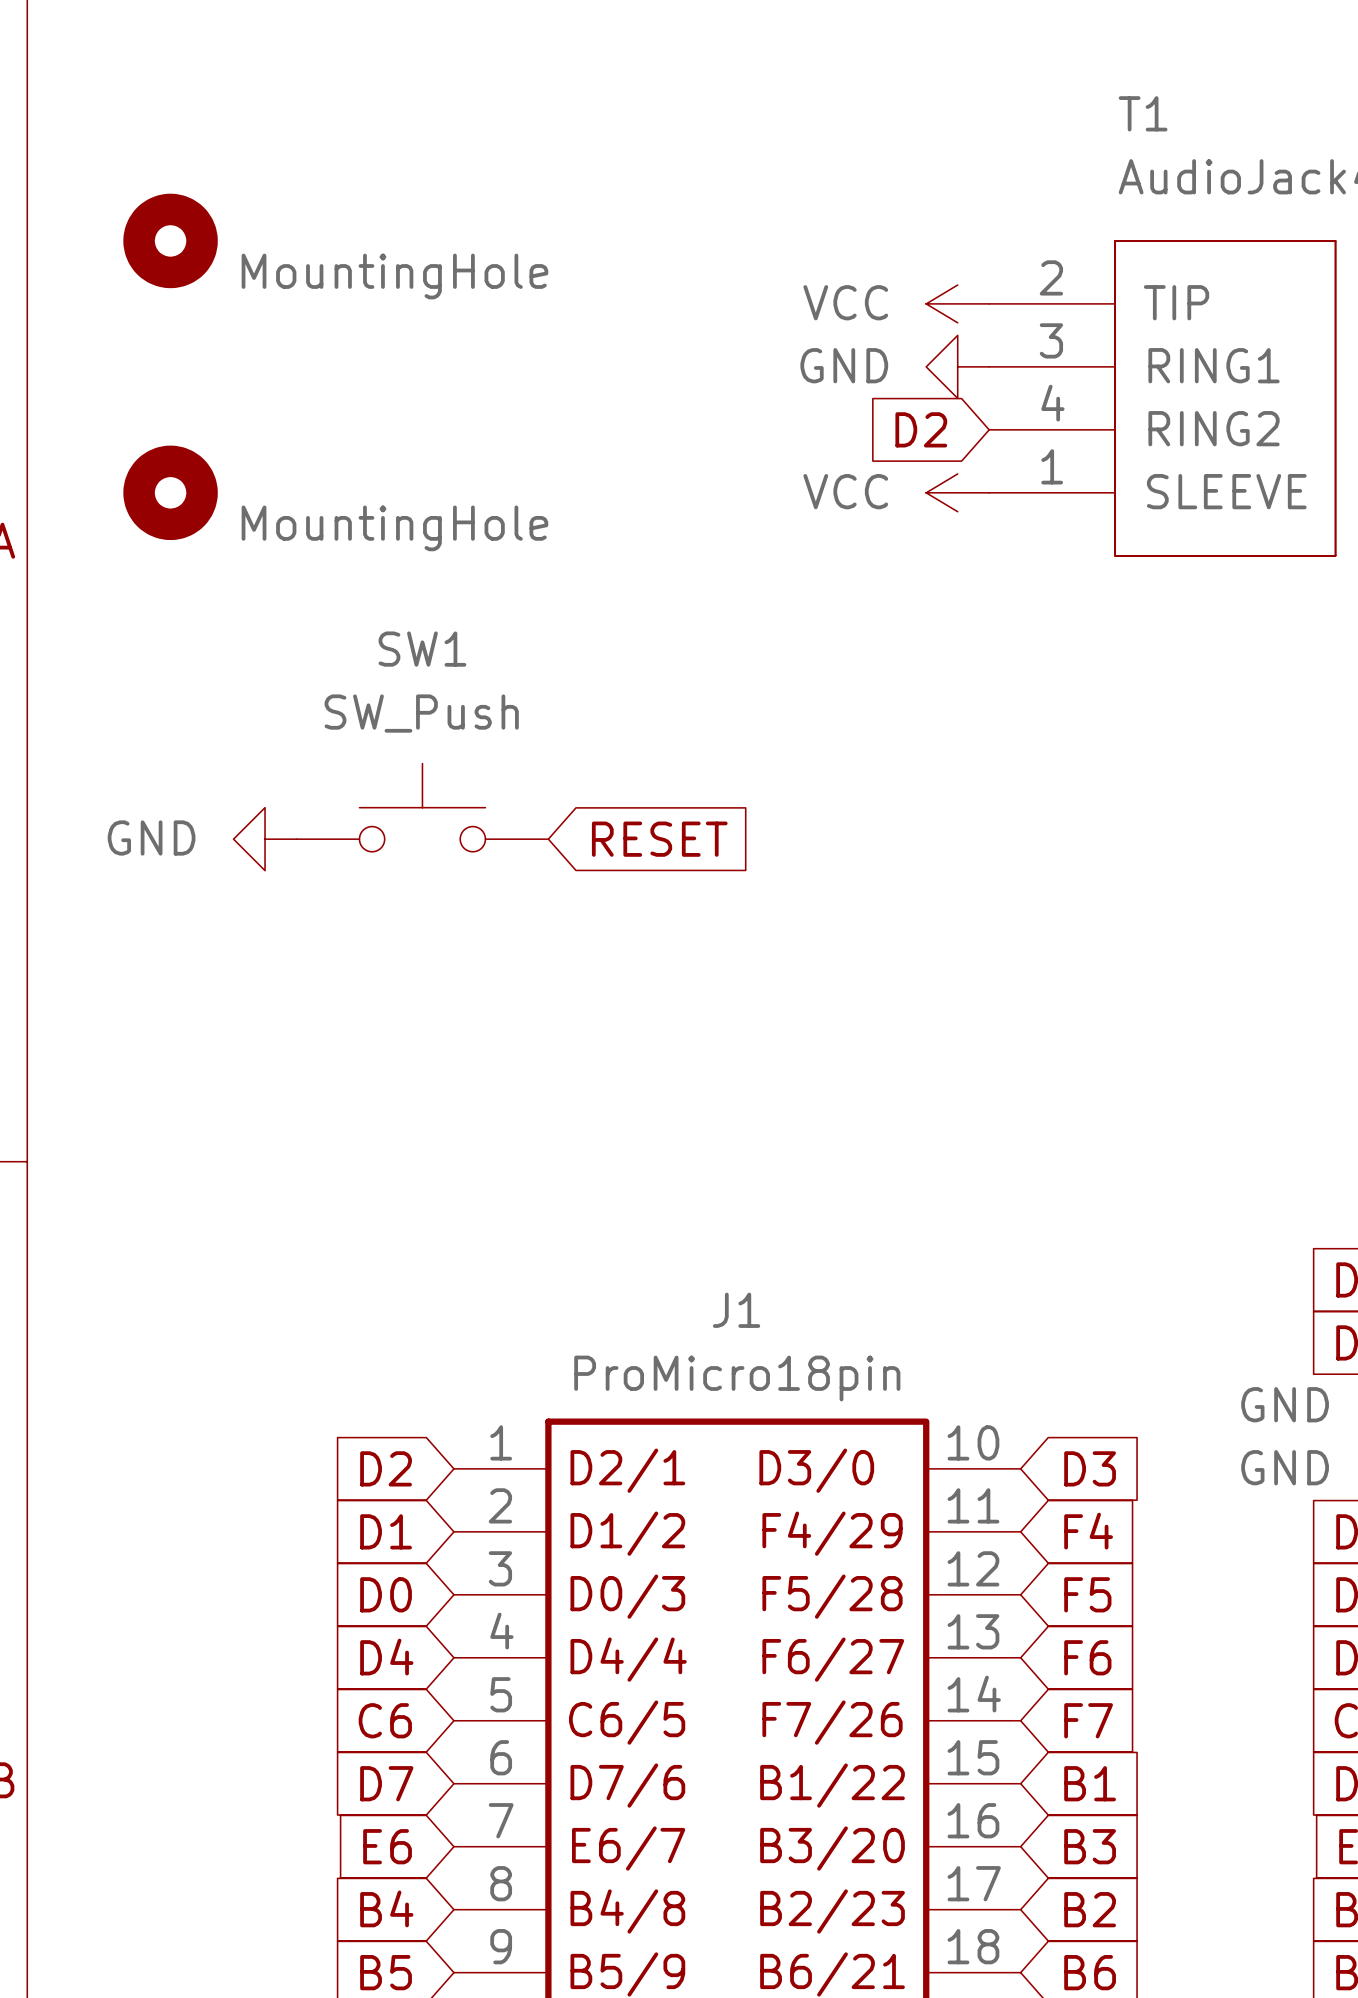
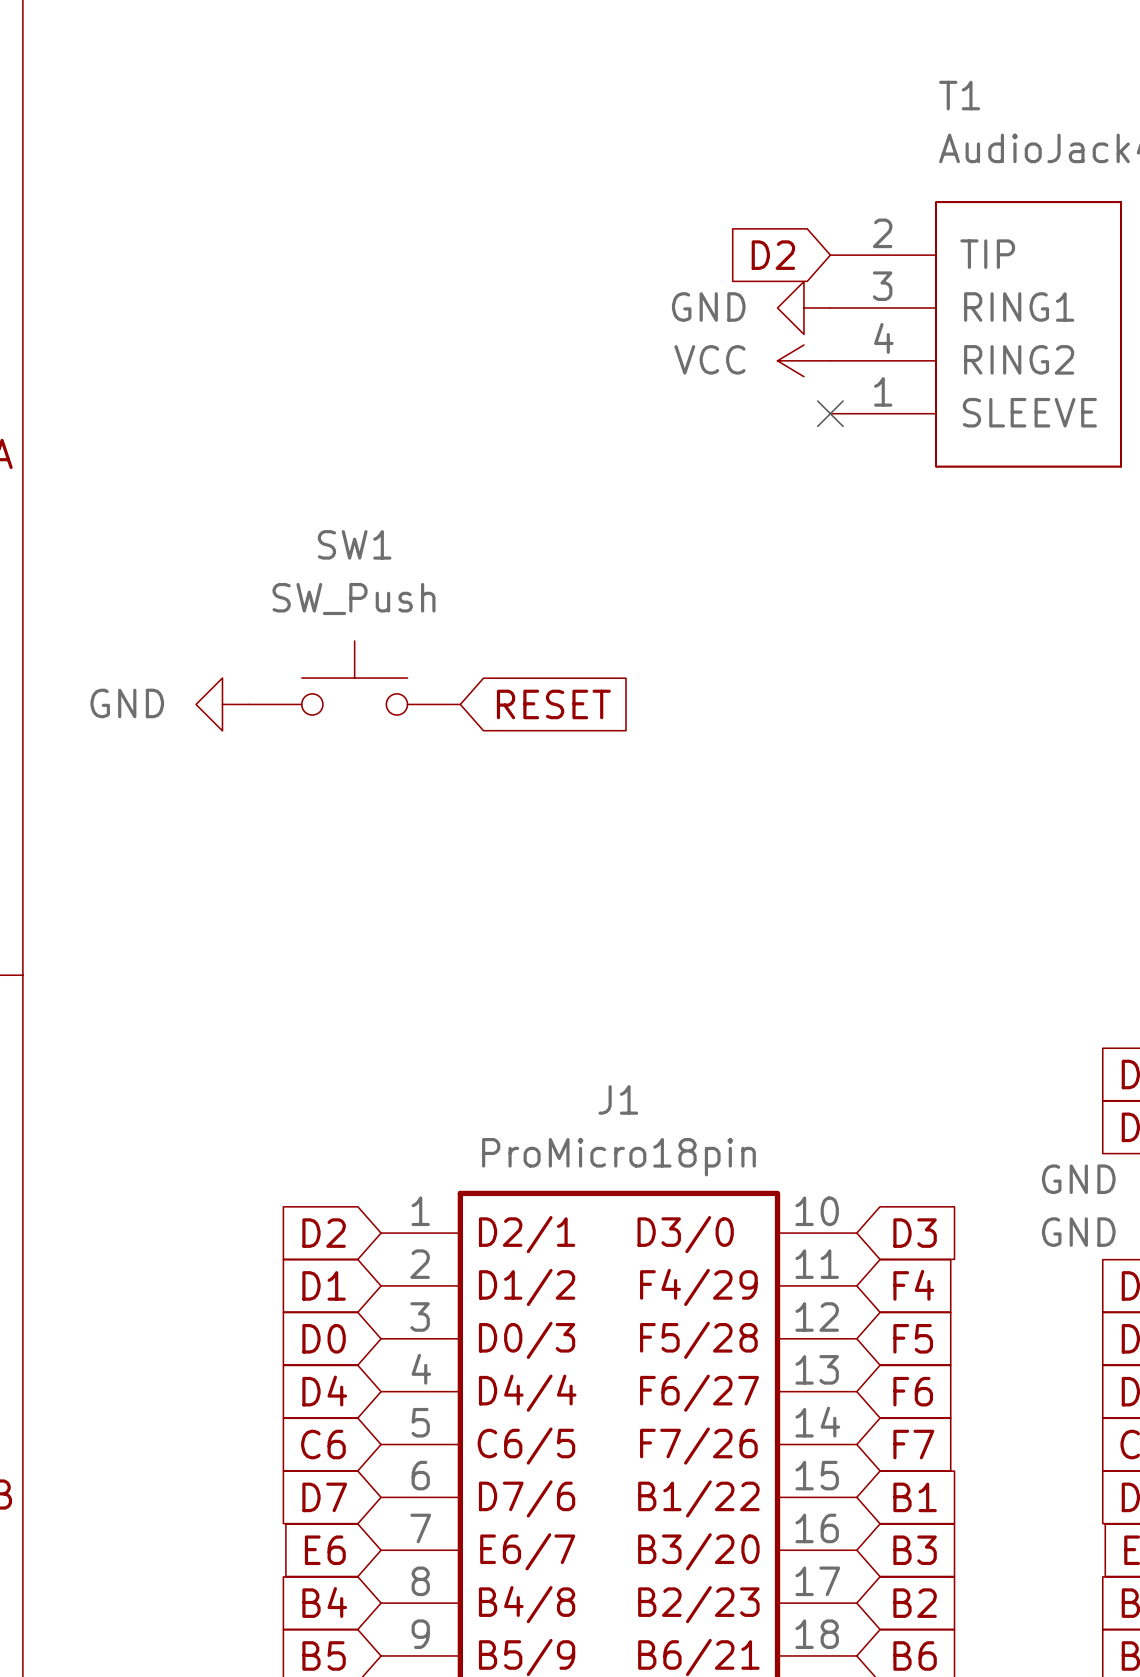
part: MountingHole (170, 240) -> none
power symbol: VCC (957, 303) -> none
global label position: D2 (921, 429) -> D2 (773, 255)
power symbol: none -> VCC (803, 360)
part: MountingHole (170, 492) -> none
power symbol: VCC (957, 492) -> none
no-connect mark: none -> (830, 413)

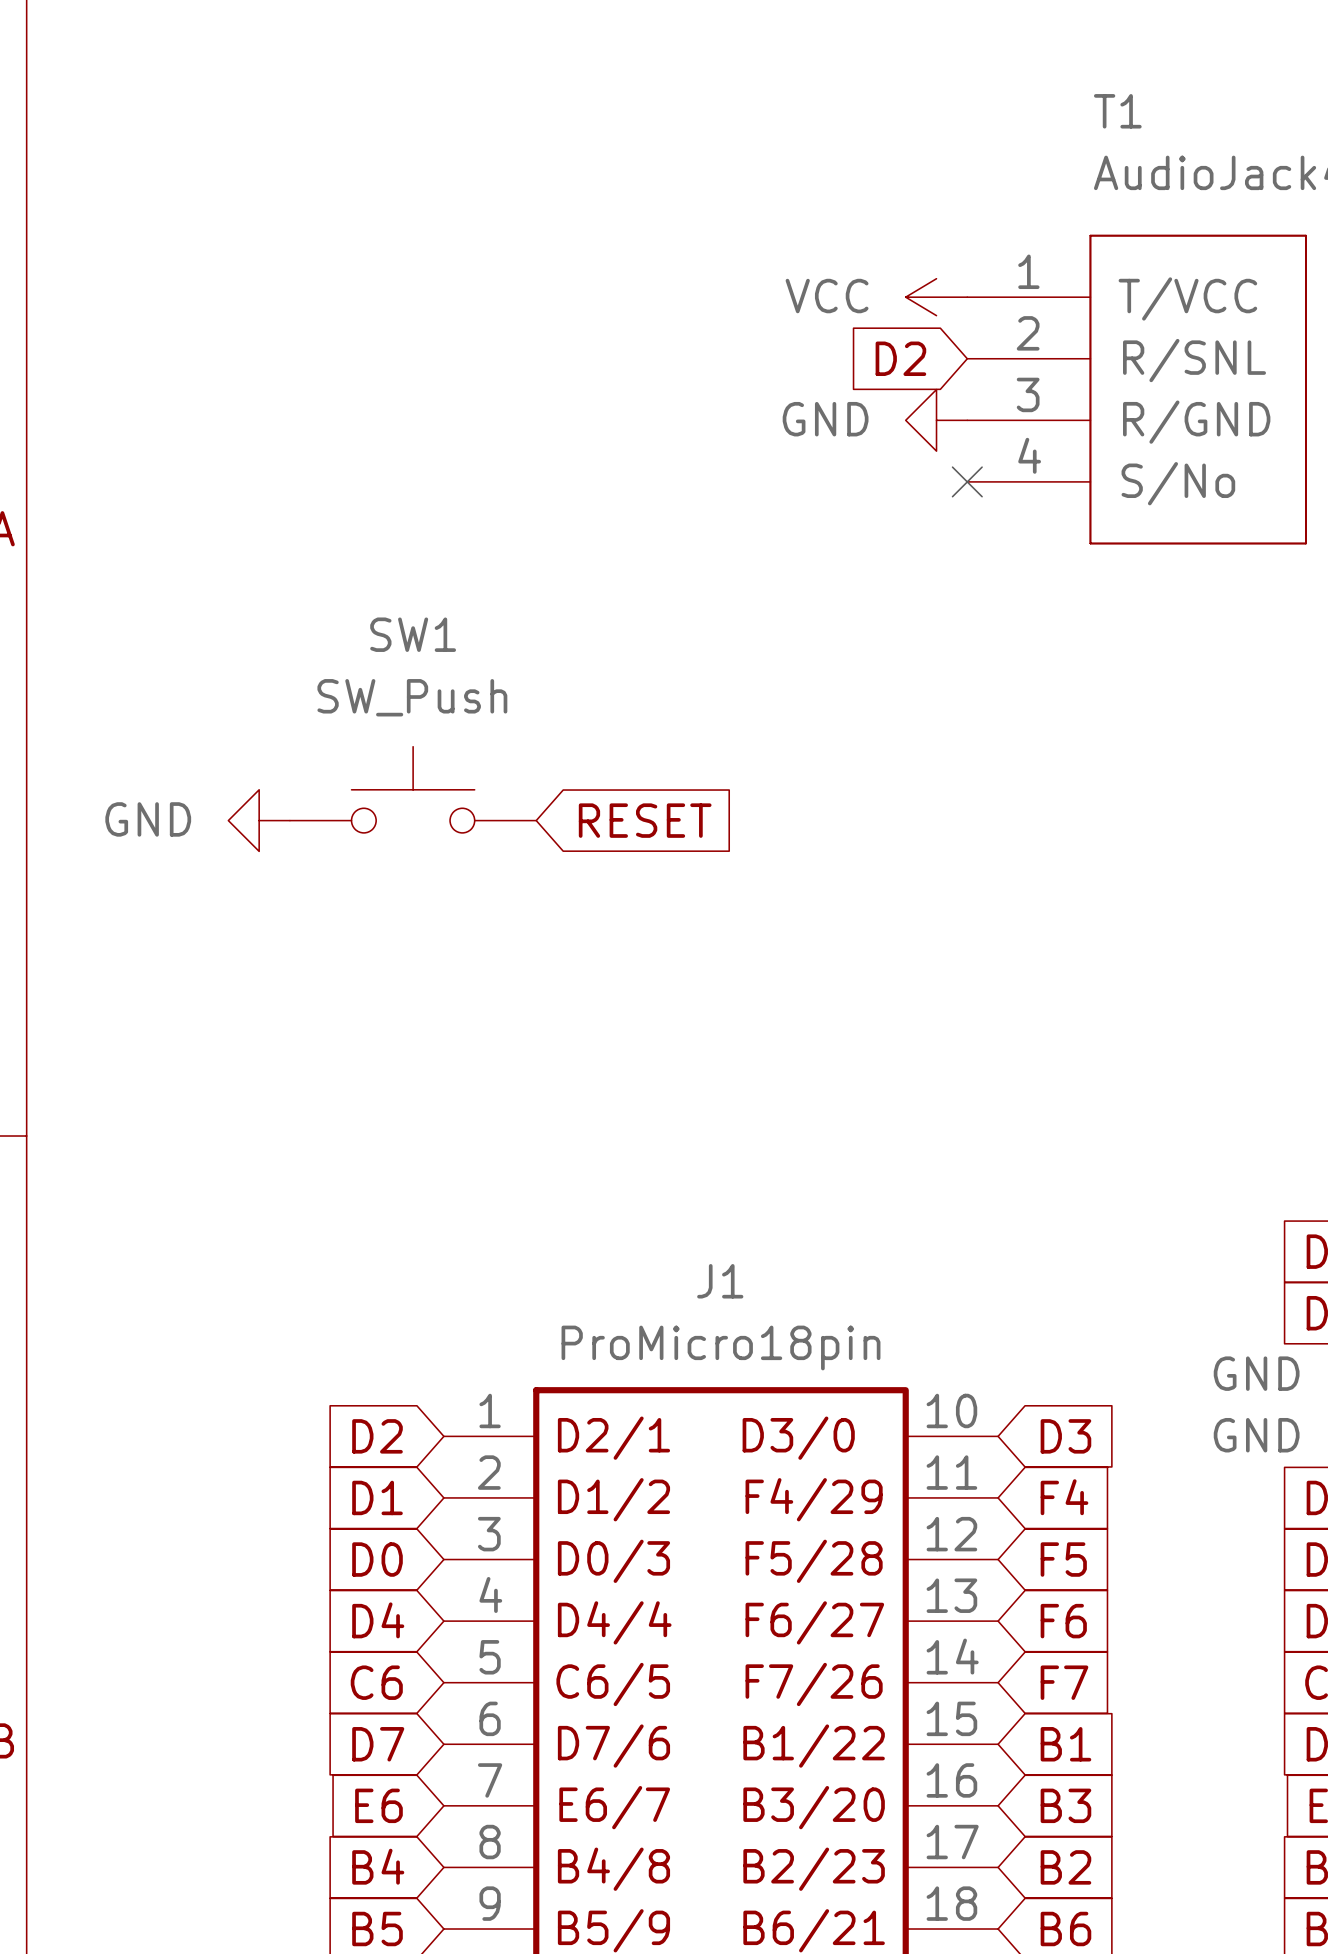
T1 pin number: 2 (882, 233) -> 1 (1028, 271)
T1 pin name: TIP (987, 254) -> T/VCC (1187, 298)
global label position: D2 (773, 255) -> D2 (900, 358)
power symbol: none -> VCC (936, 297)
T1 pin number: 3 (882, 286) -> 2 (1028, 333)
T1 pin name: RING1 (1019, 306) -> R/SNL (1194, 360)
power symbol: GND (803, 307) -> none
T1 pin number: 4 (883, 338) -> 3 (1028, 394)
T1 pin name: RING2 (1019, 359) -> R/GND (1196, 422)
power symbol: VCC (803, 360) -> GND (936, 420)
T1 pin number: 1 (883, 391) -> 4 (1029, 455)
T1 pin name: SLEEVE (1029, 412) -> S/No (1178, 483)

